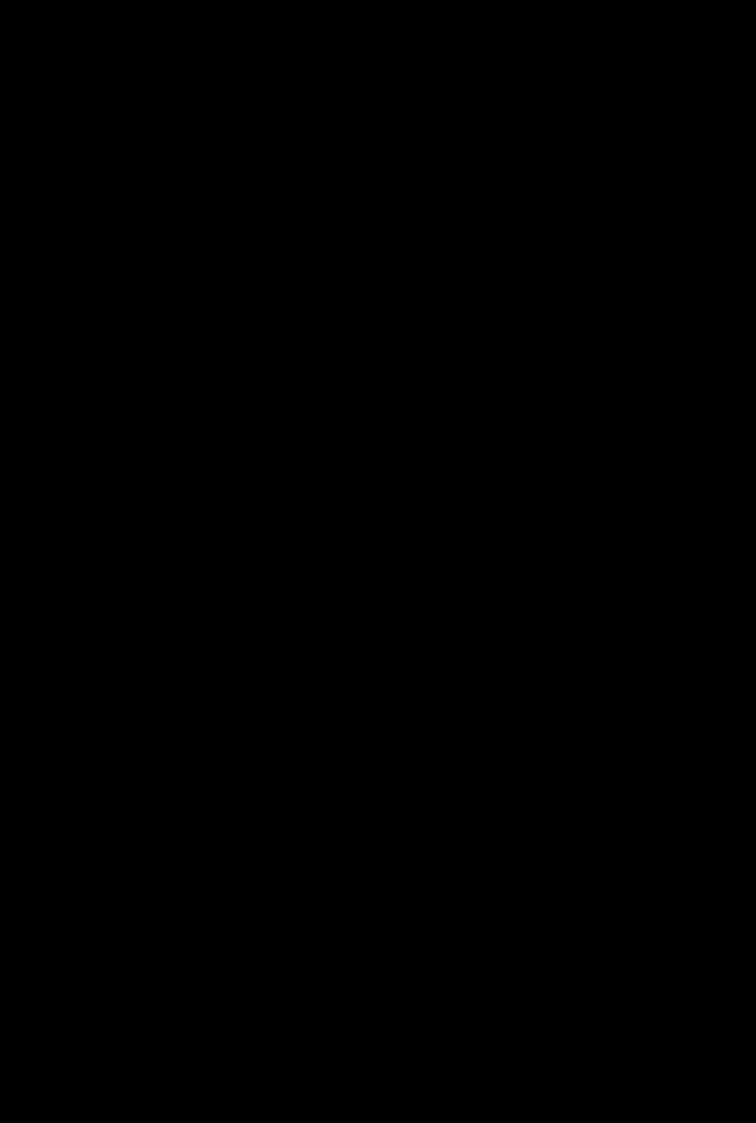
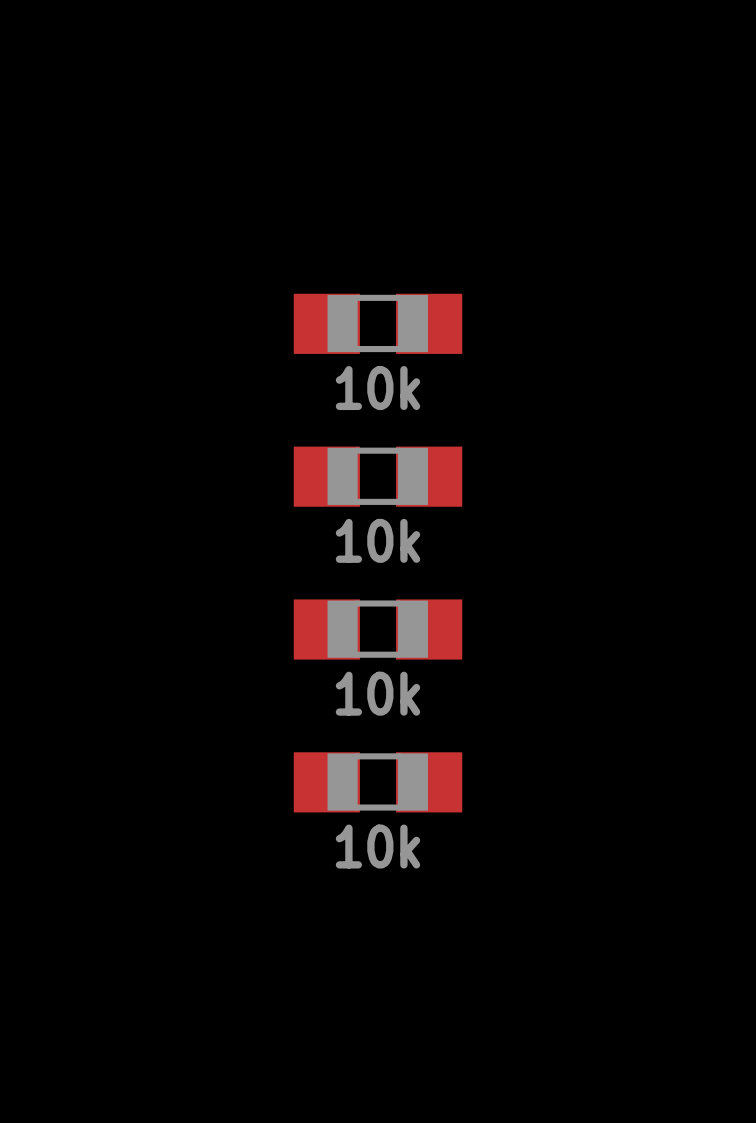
part: none -> 10k (377, 323)
part: none -> 10k (377, 476)
part: none -> 10k (377, 629)
part: none -> 10k (377, 782)

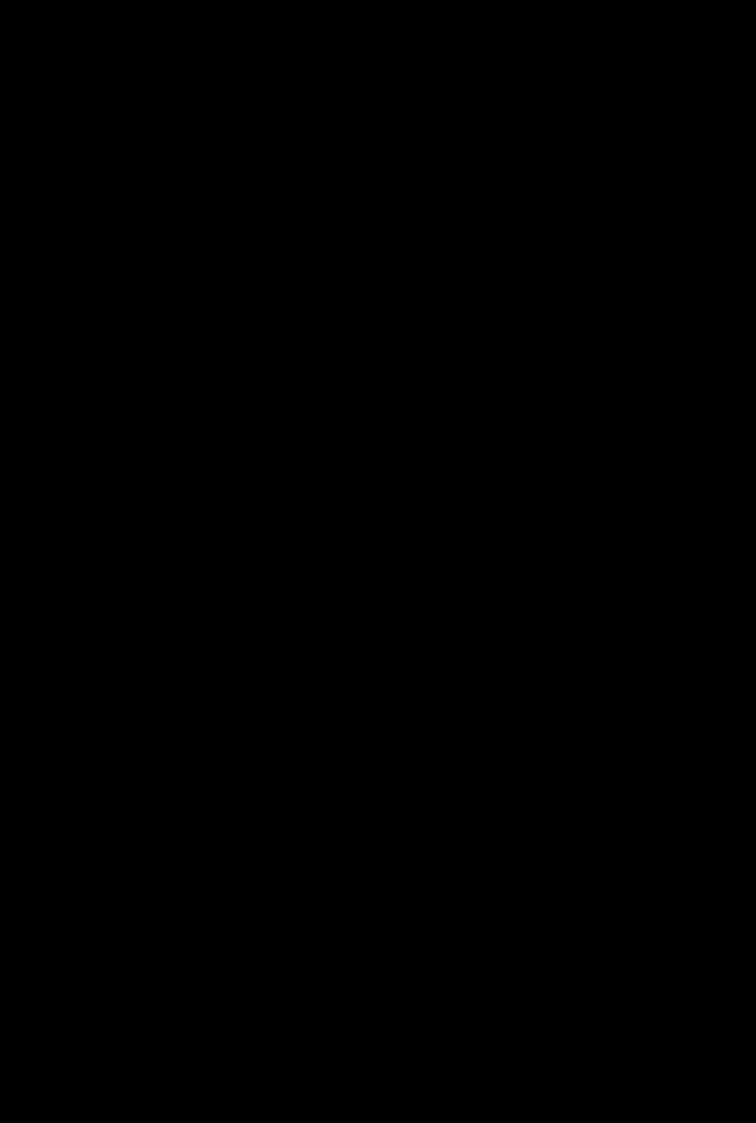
part: 10k (377, 323) -> none
part: 10k (377, 476) -> none
part: 10k (377, 629) -> none
part: 10k (377, 782) -> none

